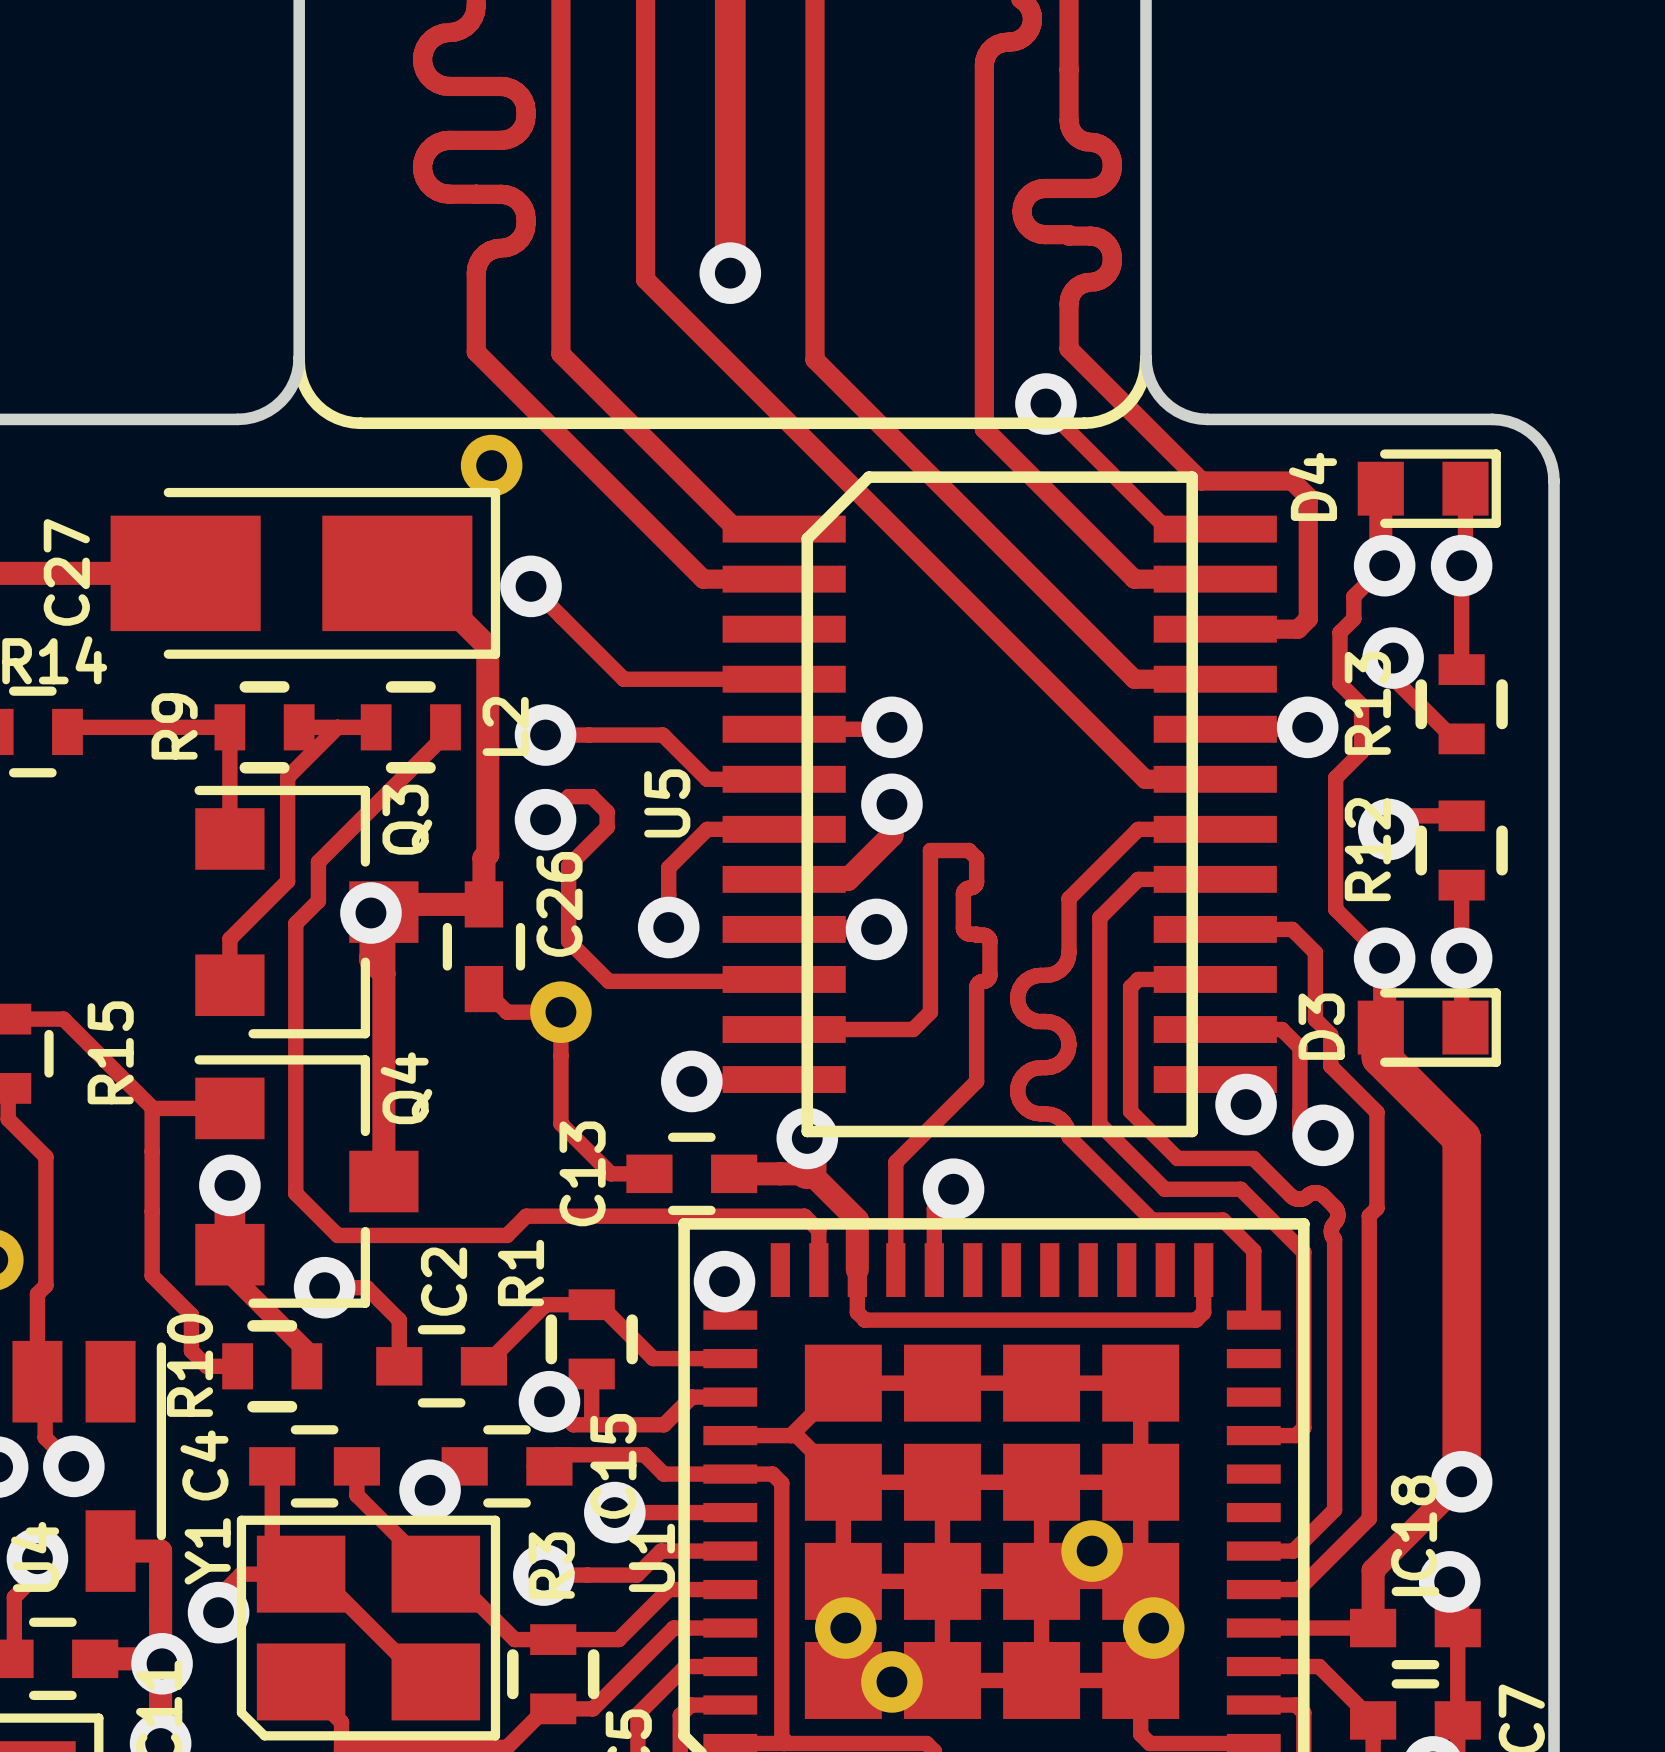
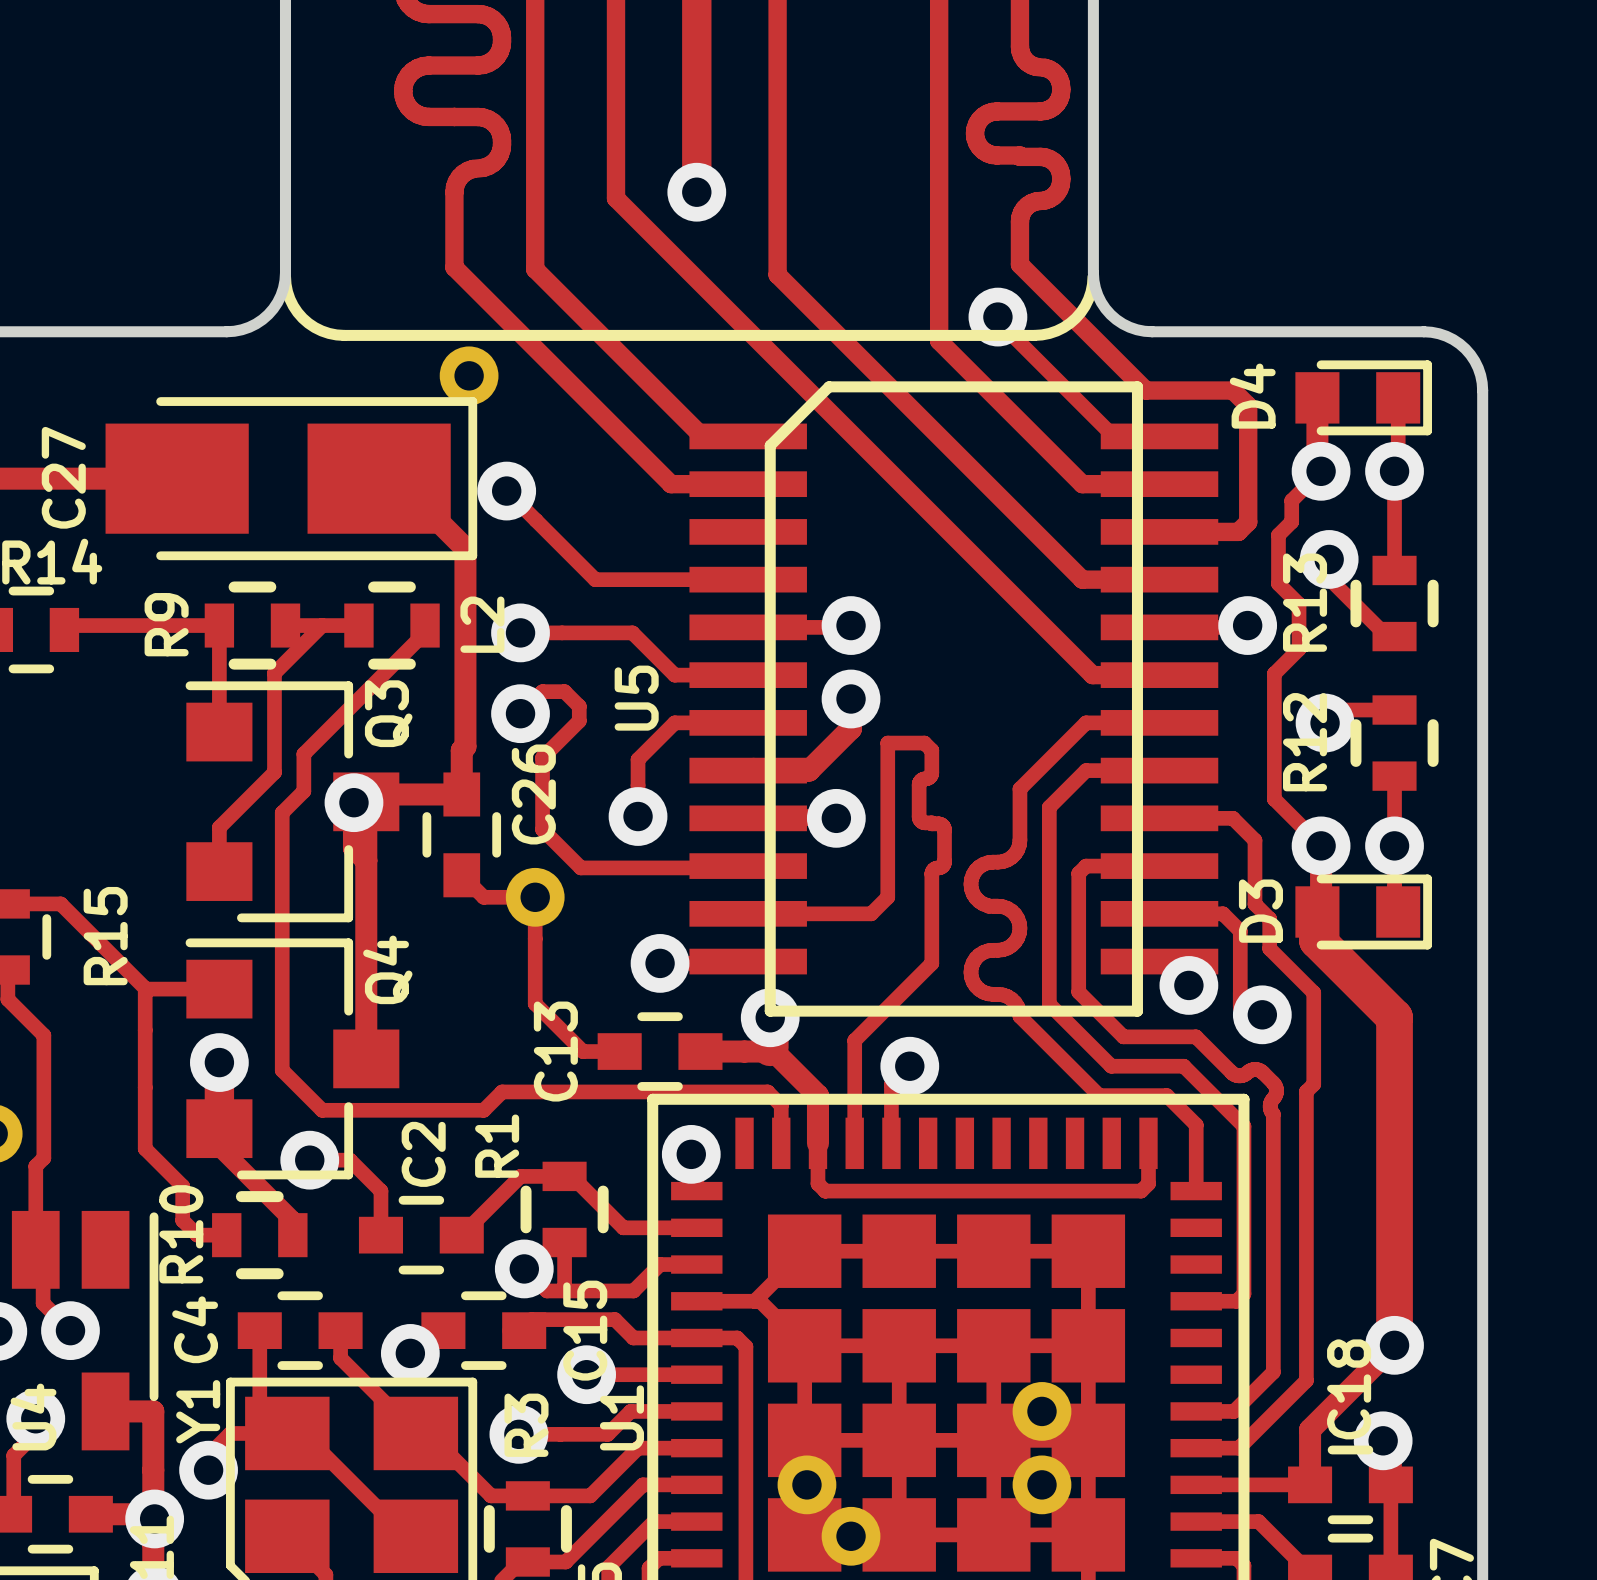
part position: (1153, 1628) -> (1041, 1484)

